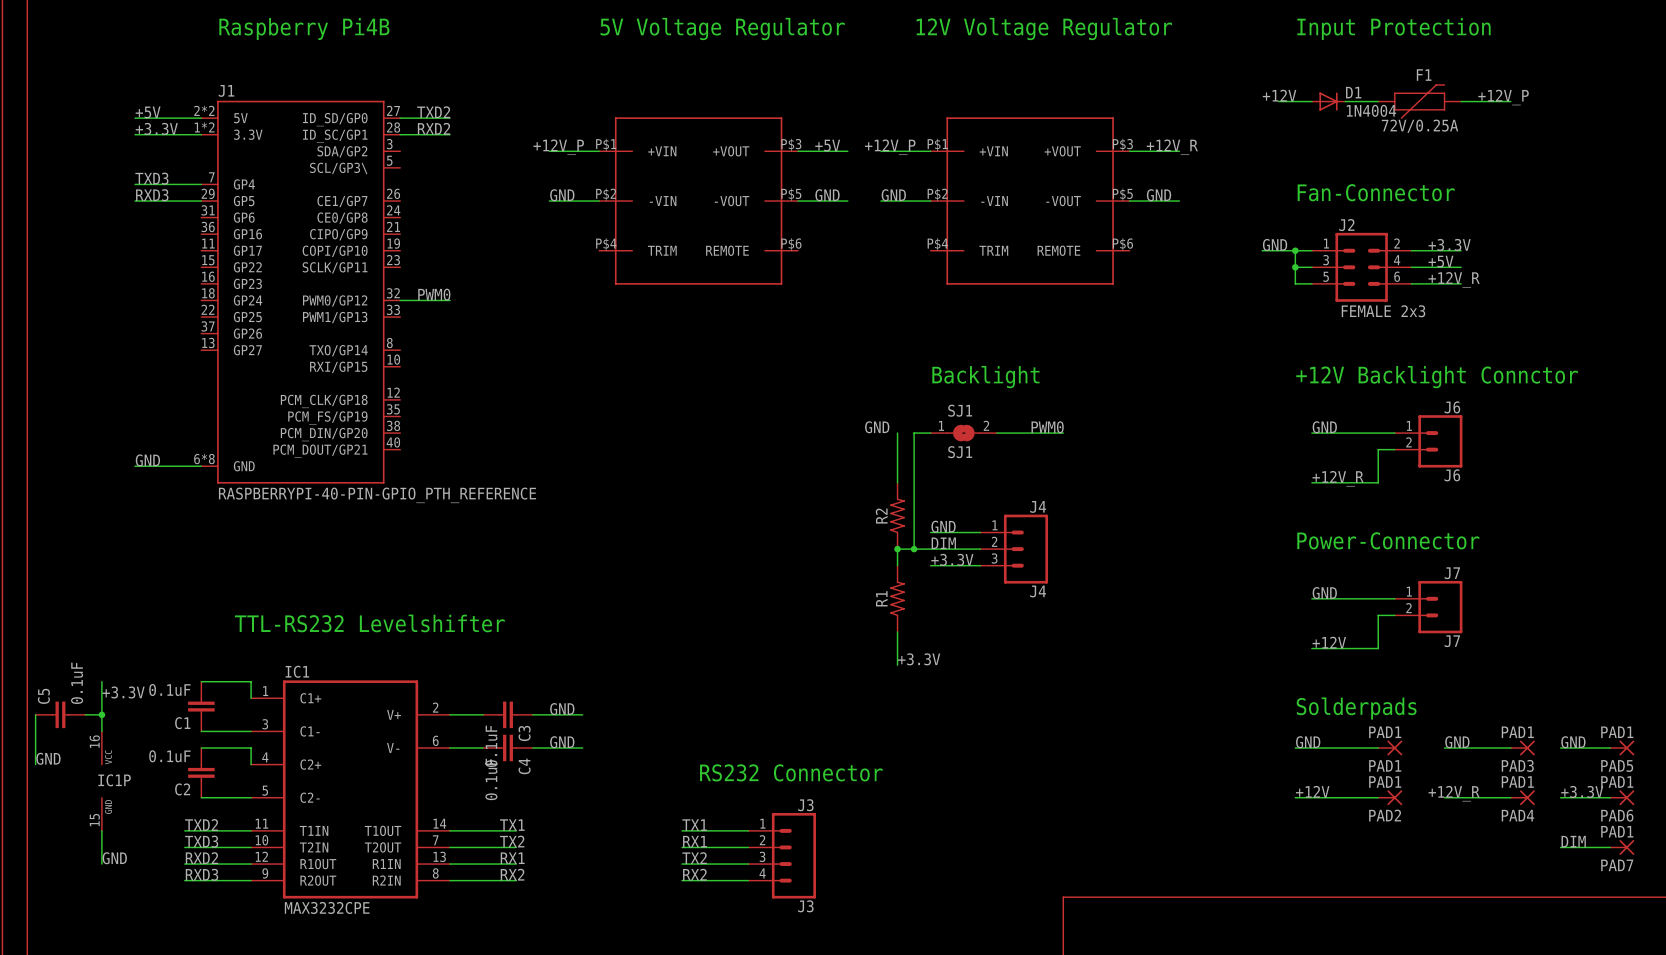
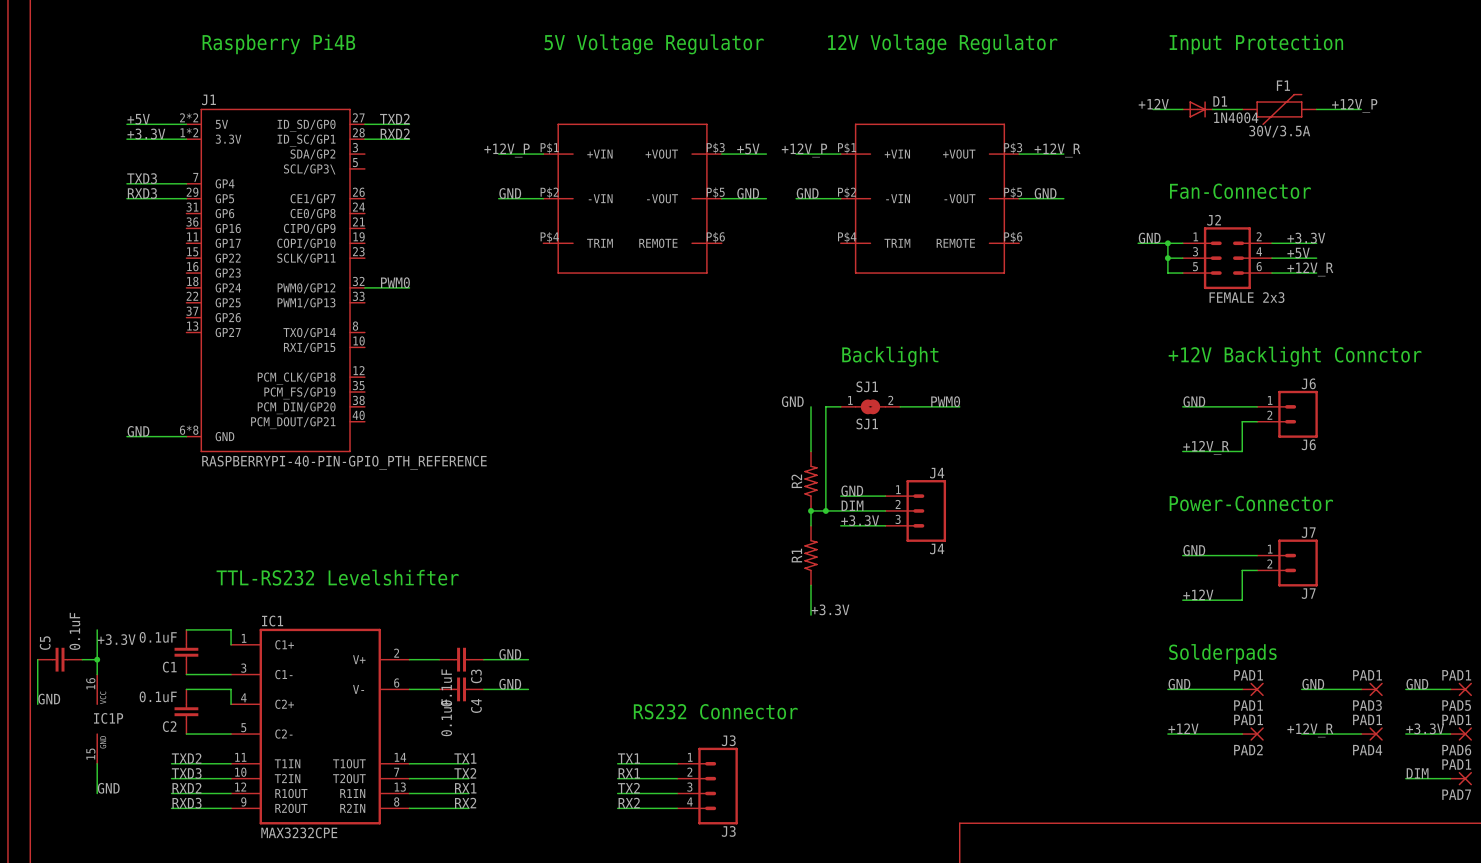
F1 value: 72V/0.25A (1420, 126) -> 30V/3.5A (1279, 131)

